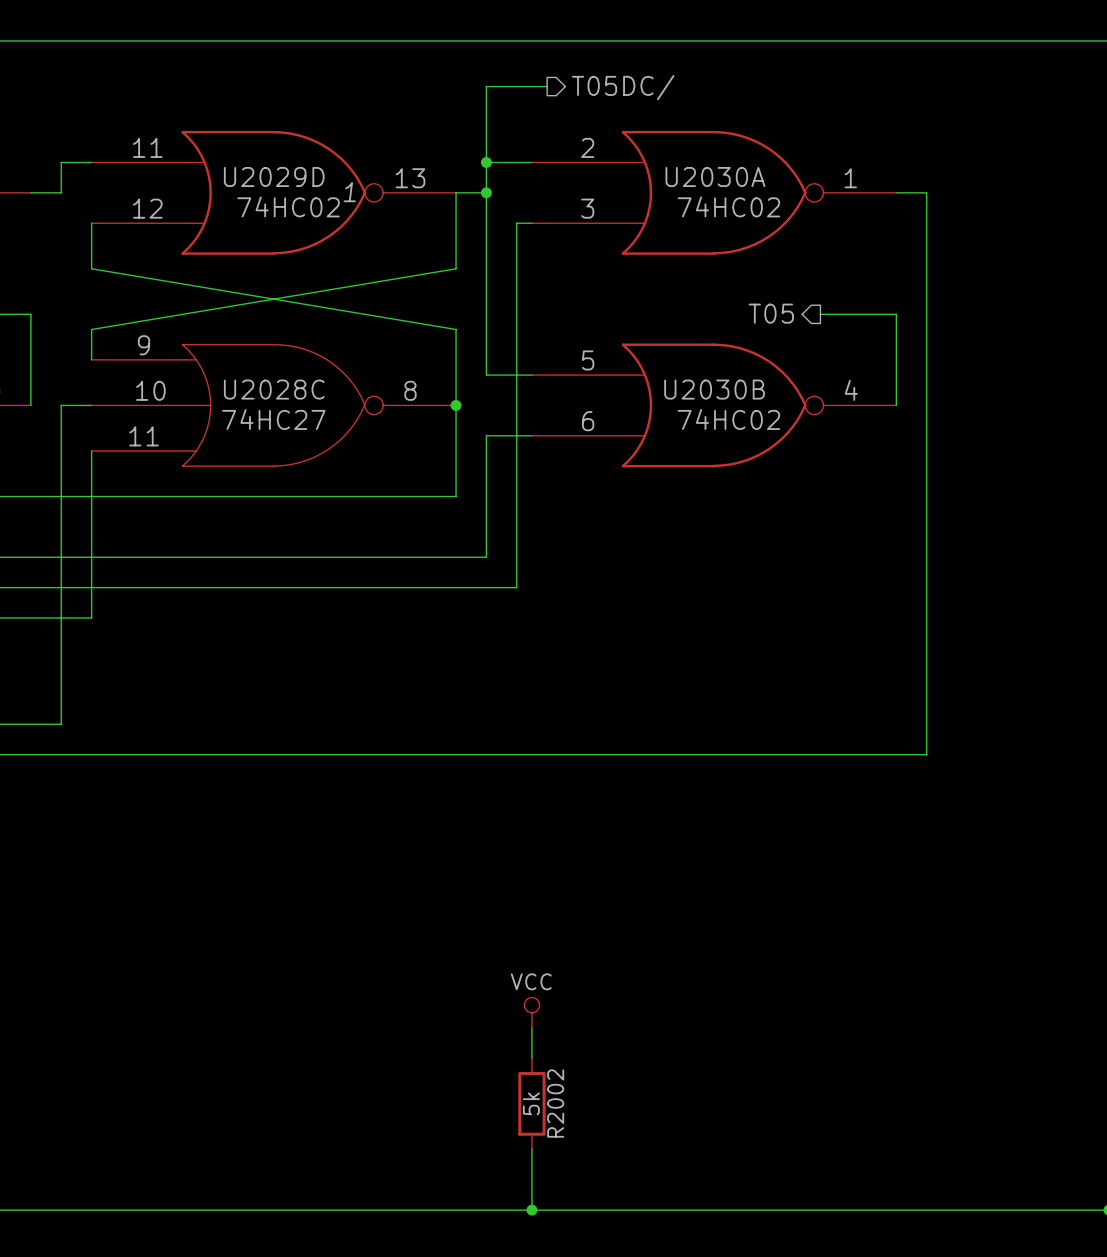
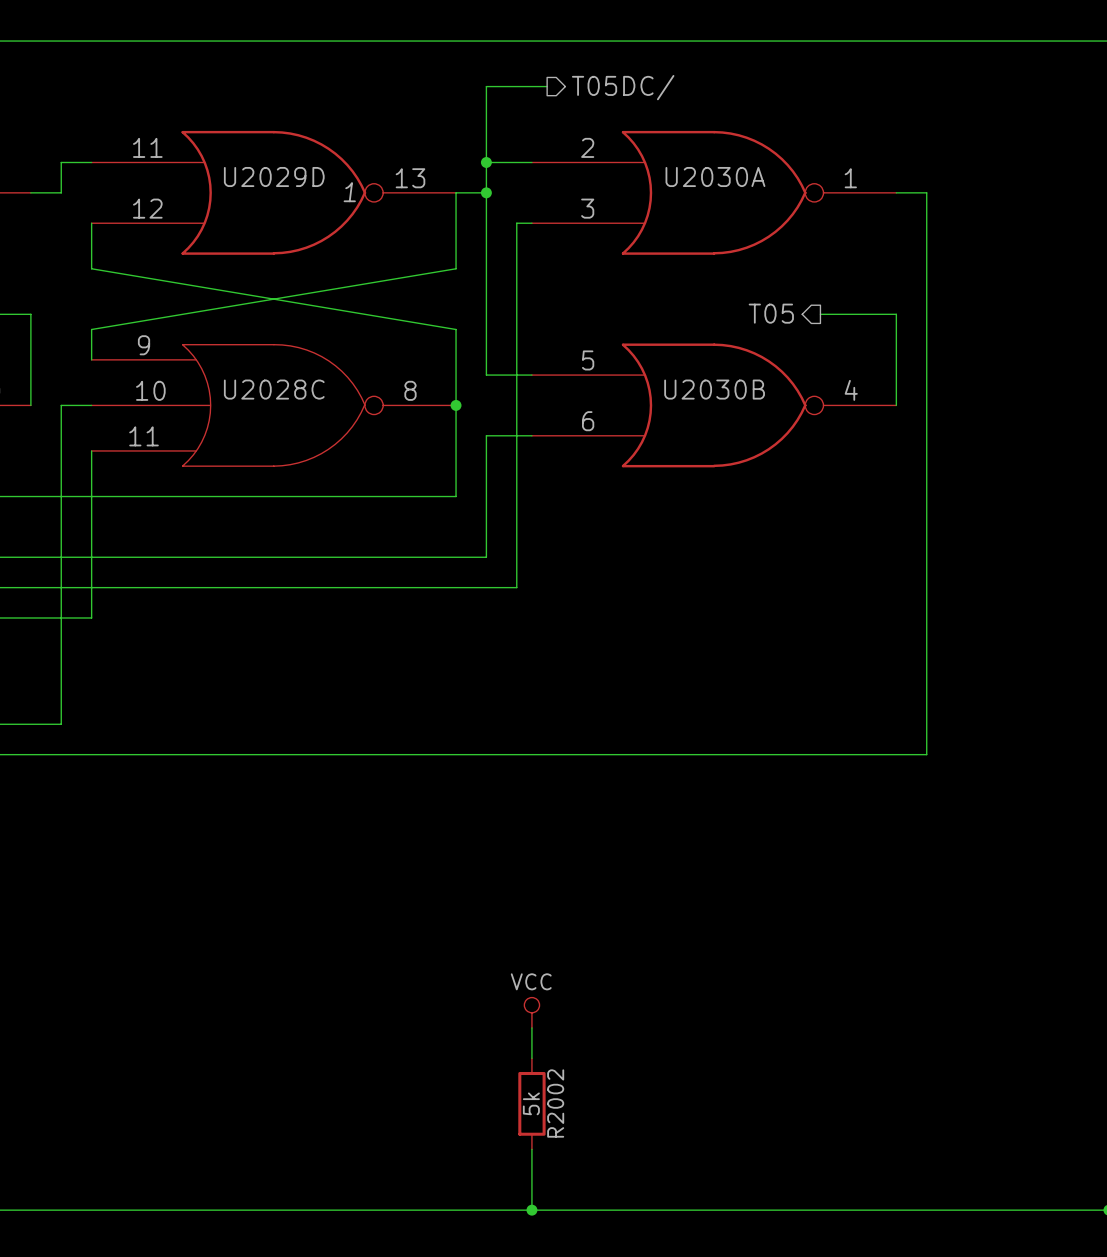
U2029D value: 74HC02 (288, 206) -> none
U2030A value: 74HC02 (728, 206) -> none
U2028C value: 74HC27 (273, 419) -> none
U2030B value: 74HC02 (728, 419) -> none

